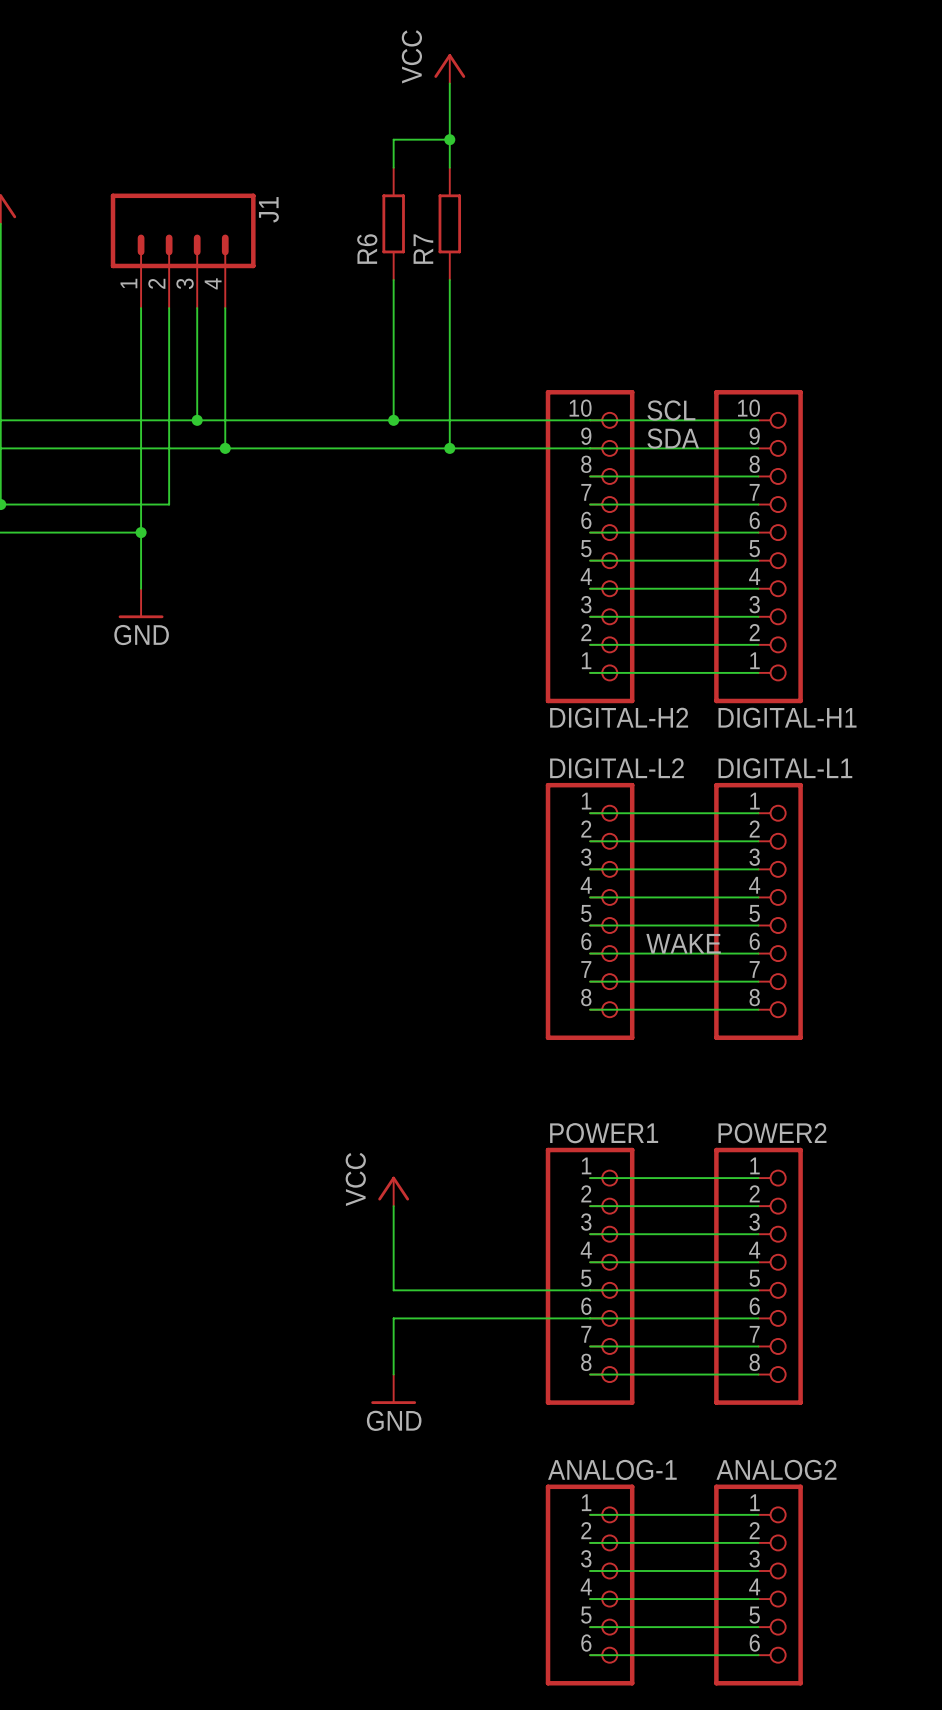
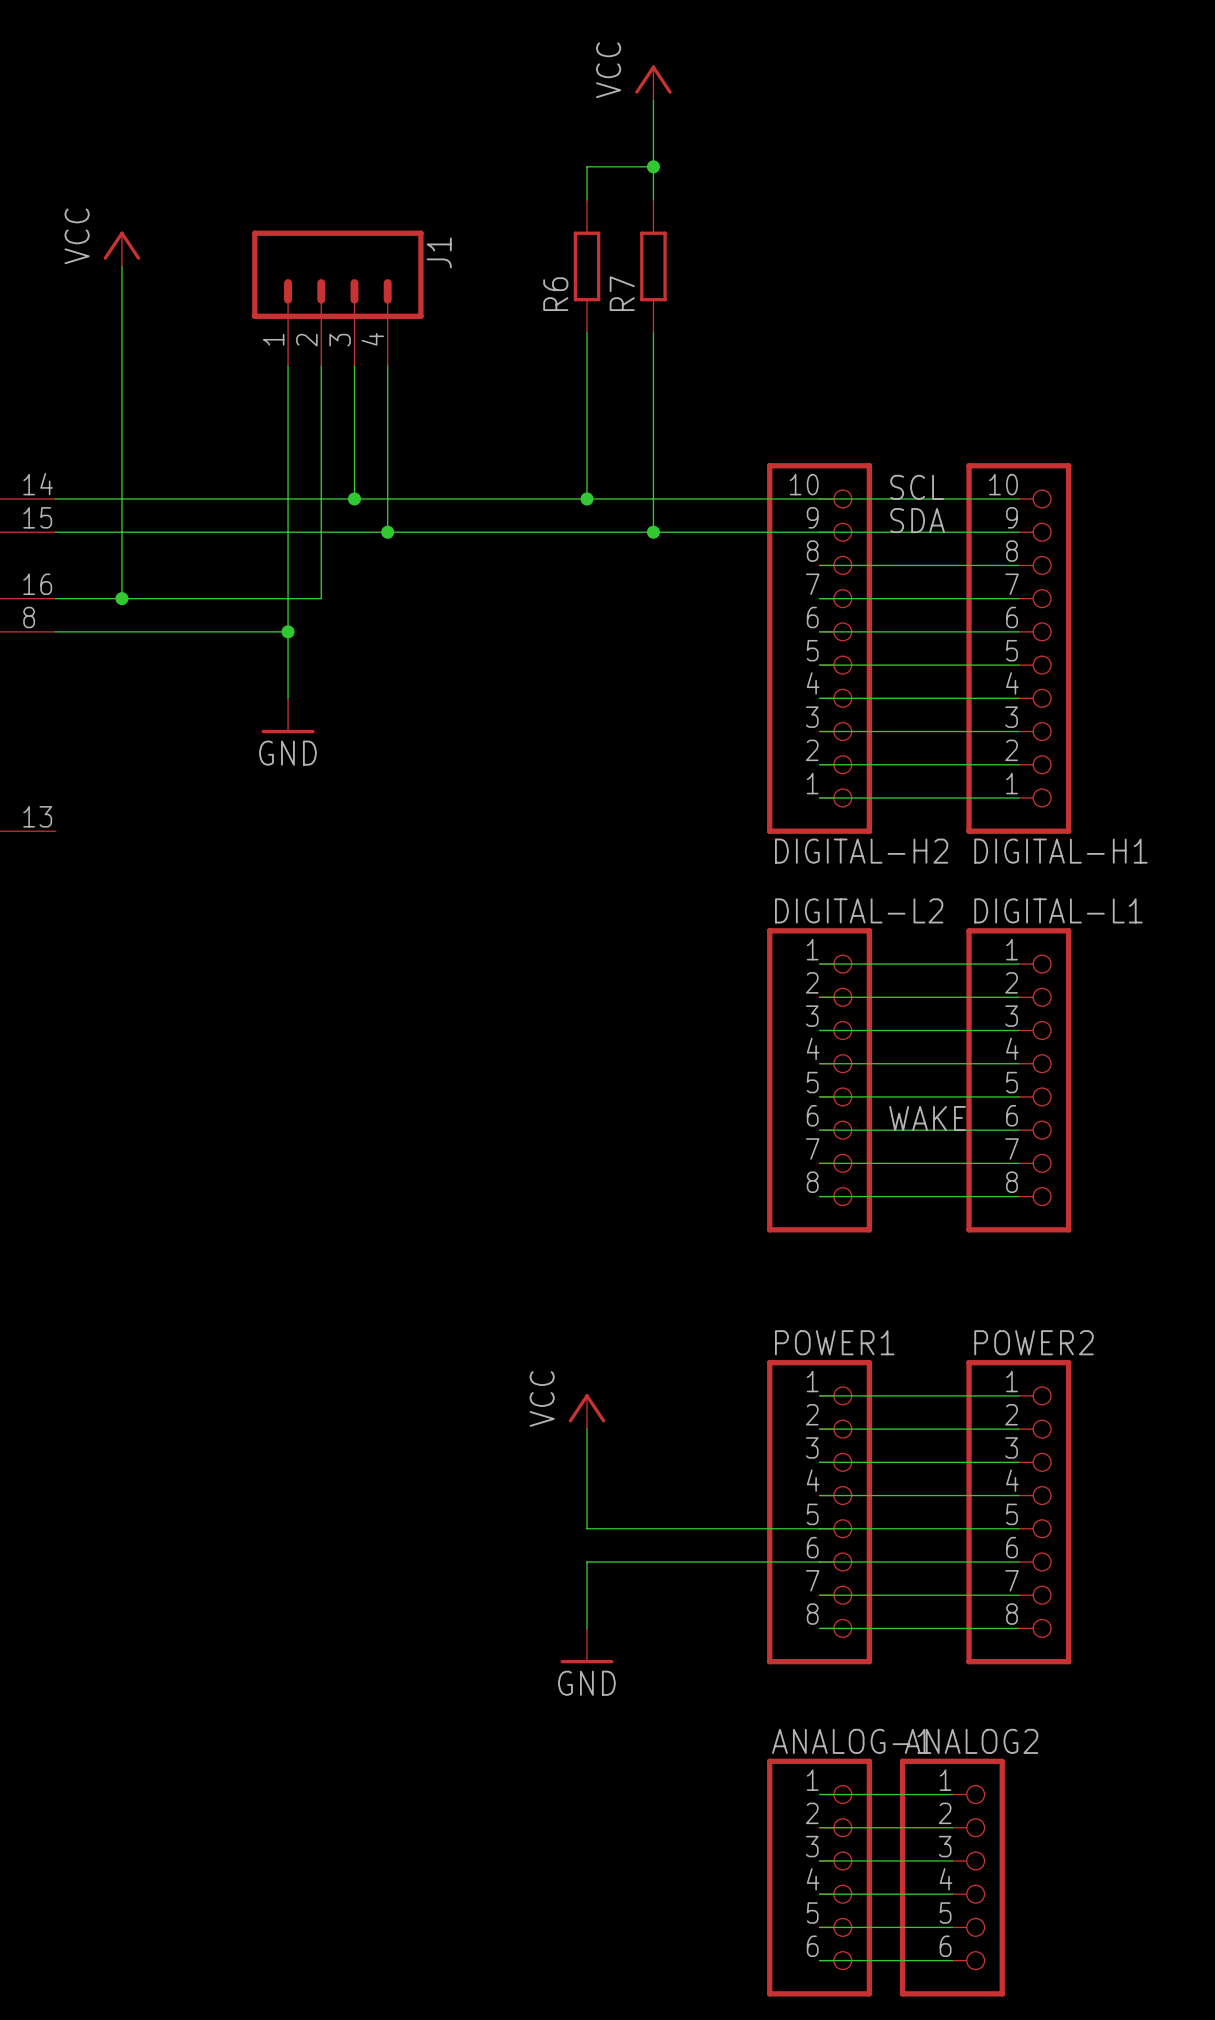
wire: (702, 1514) (758, 1514) -> none
wire: (702, 1542) (758, 1542) -> none
wire: (702, 1570) (758, 1570) -> none
ANALOG2 position: (758, 1585) -> (952, 1877)
wire: (702, 1599) (758, 1599) -> none
wire: (702, 1627) (758, 1627) -> none
wire: (702, 1655) (758, 1655) -> none

